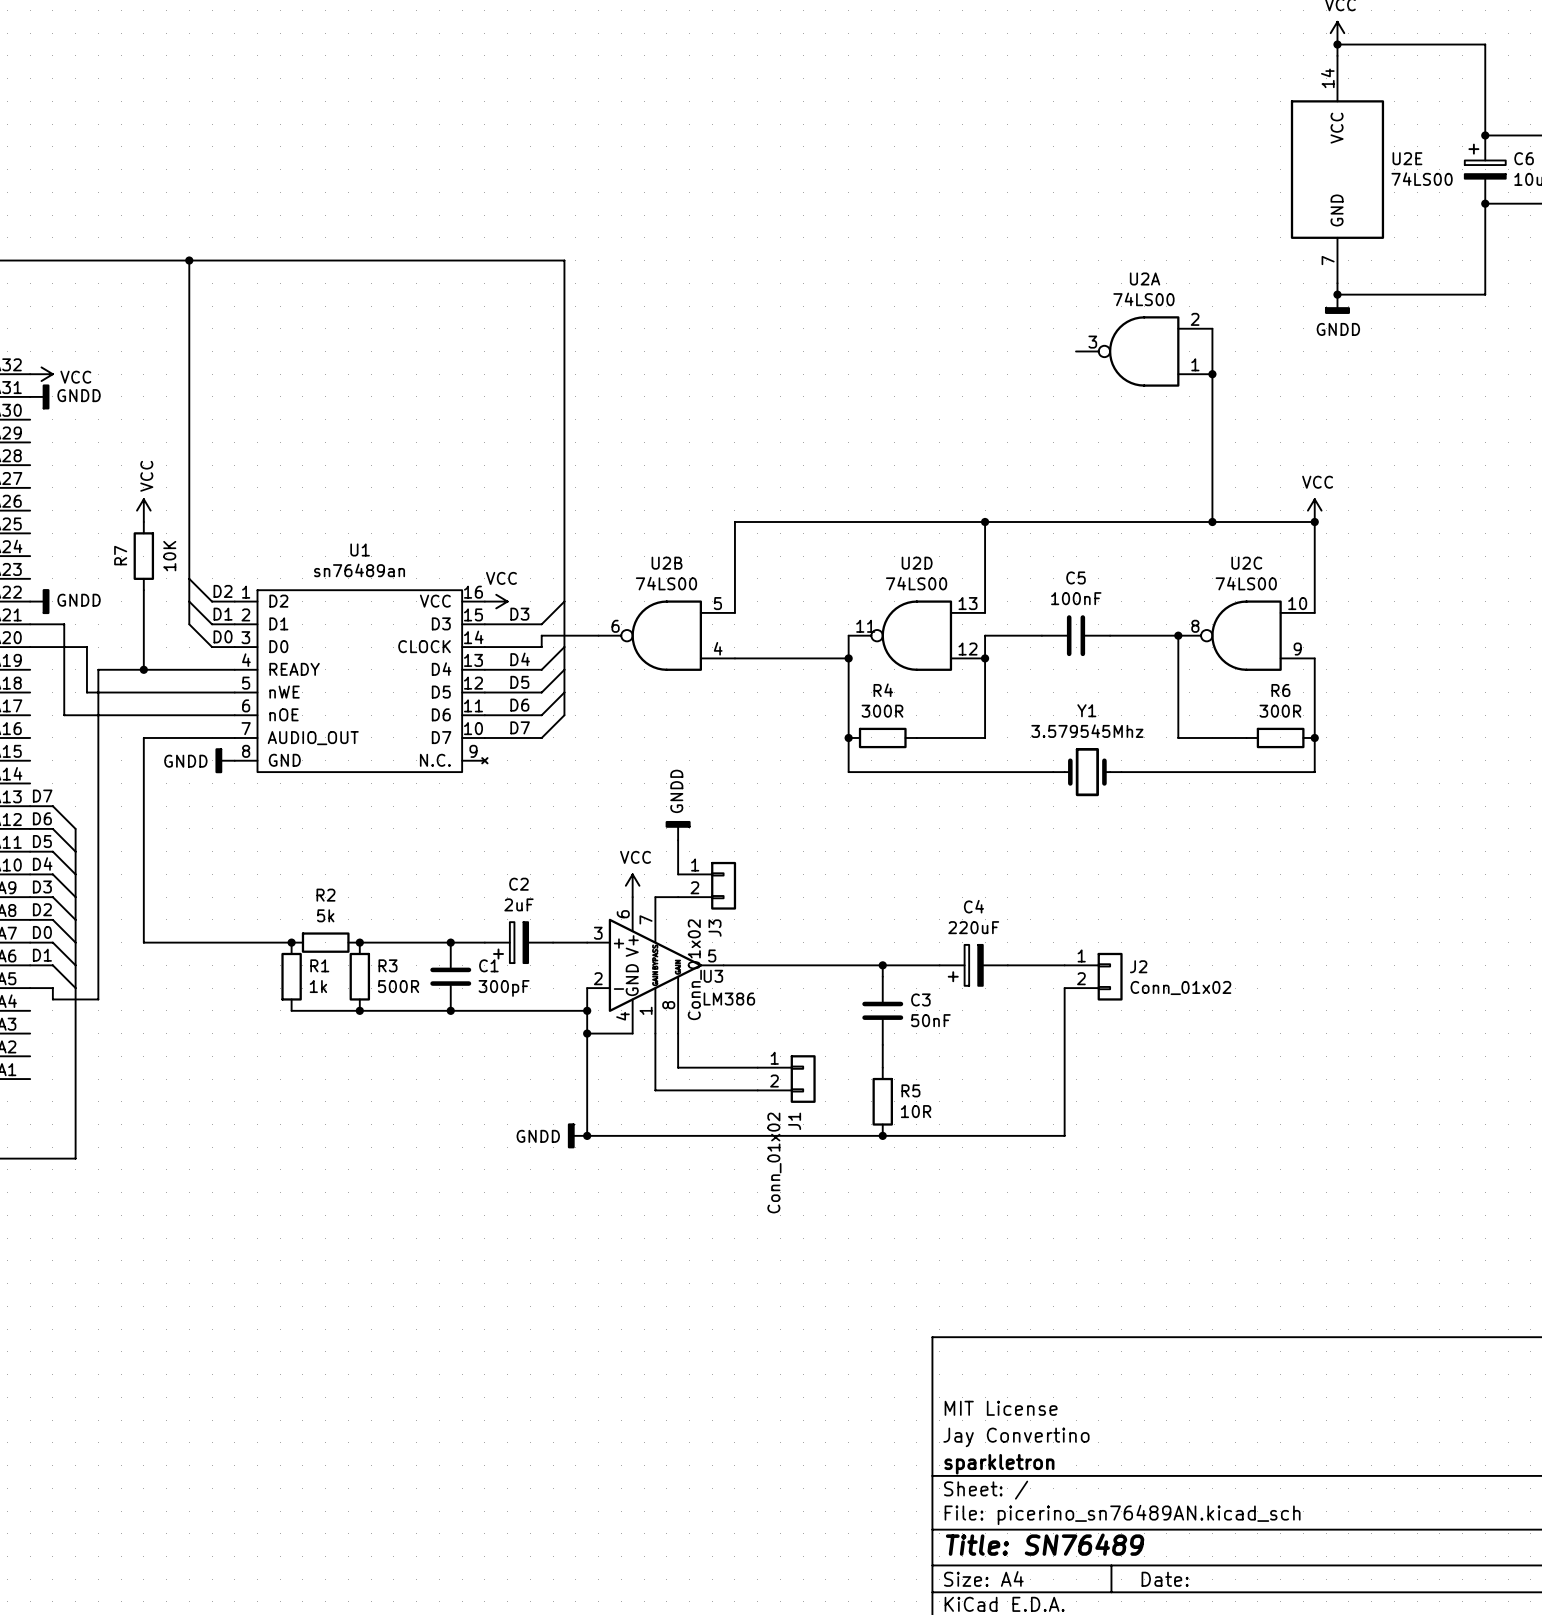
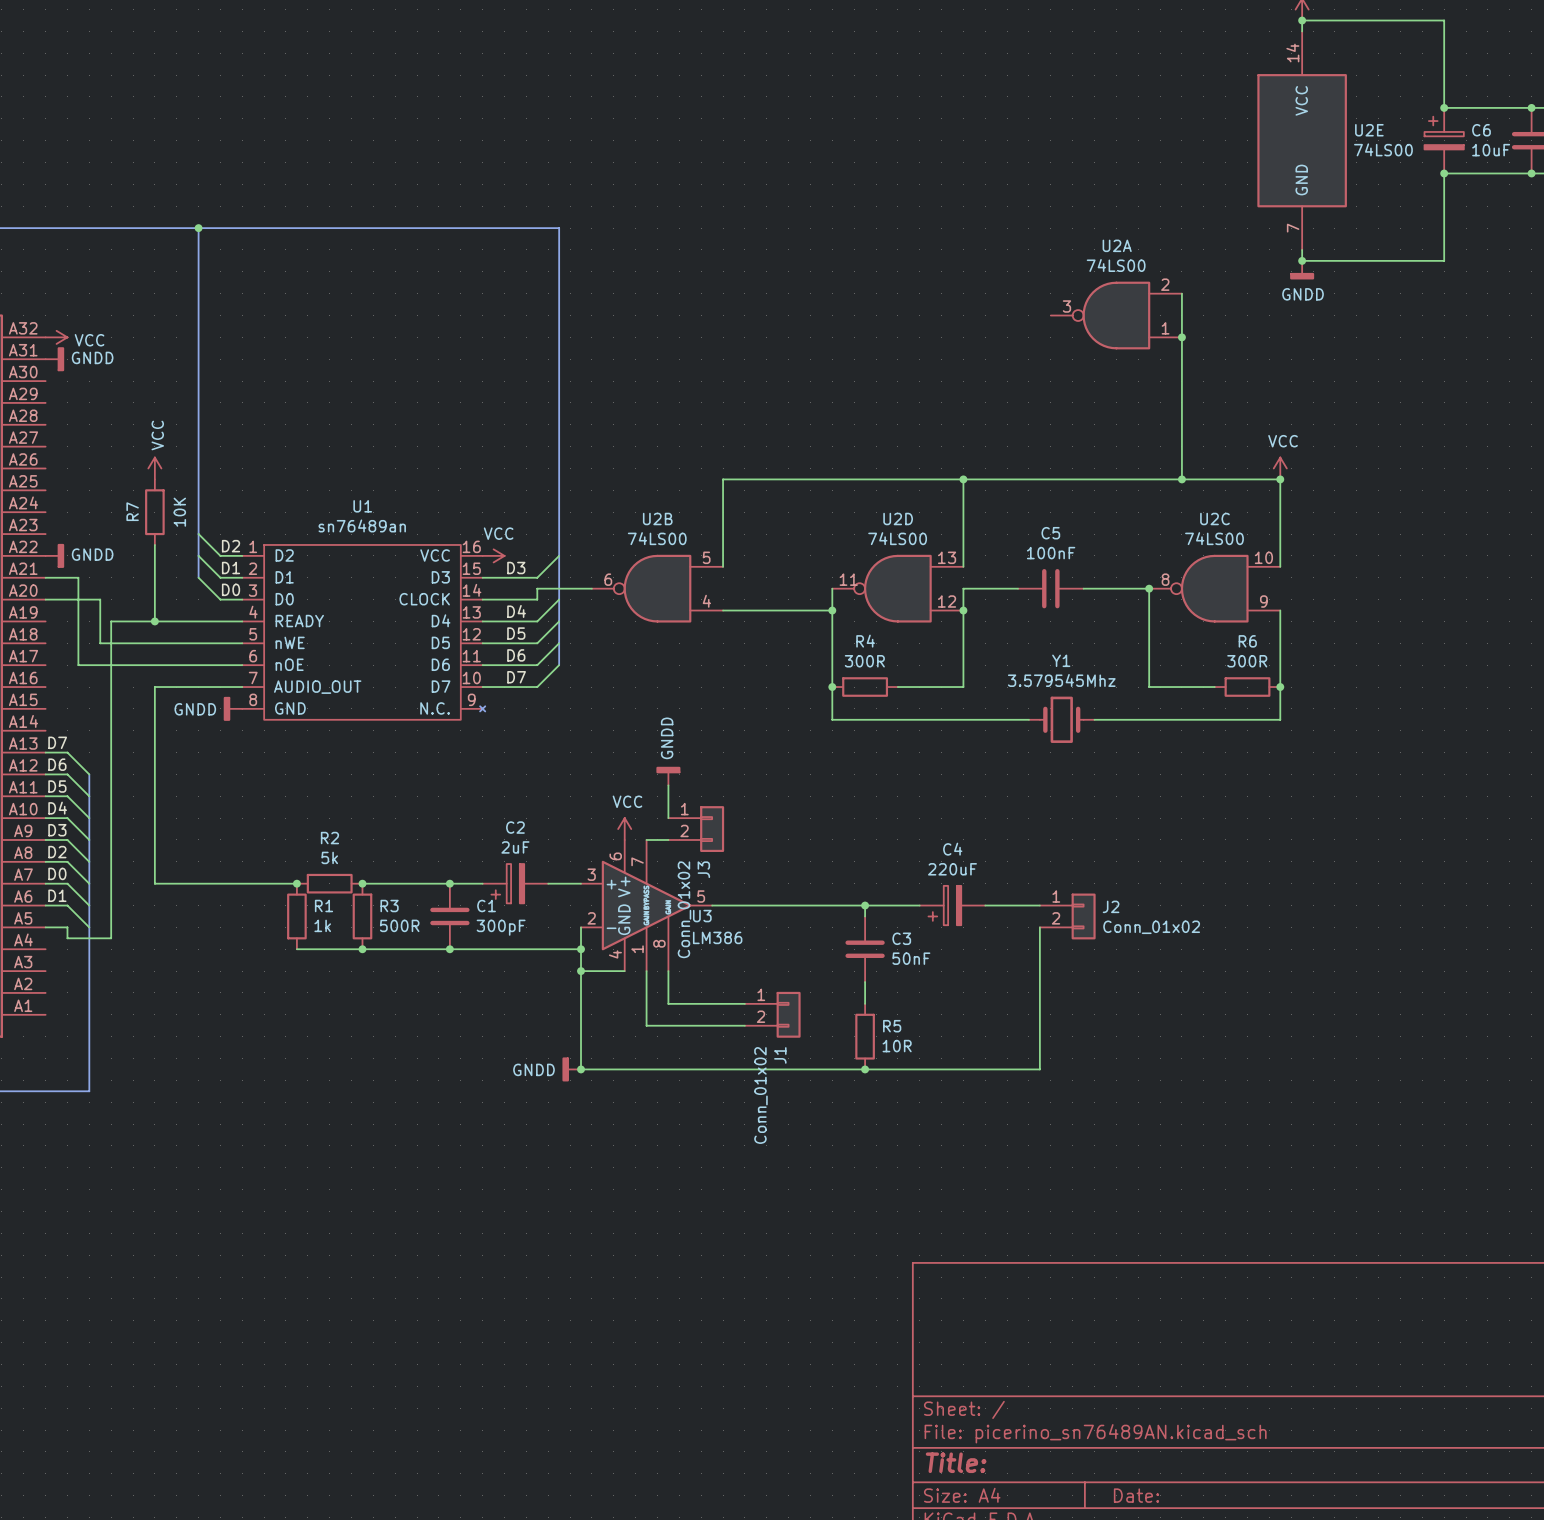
title block: MIT License (1001, 1408) -> none
title block: Jay Convertino (1016, 1437) -> none
title block: sparkletron (999, 1464) -> none
title block: Title: SN76489 (1045, 1544) -> Title: (956, 1462)

